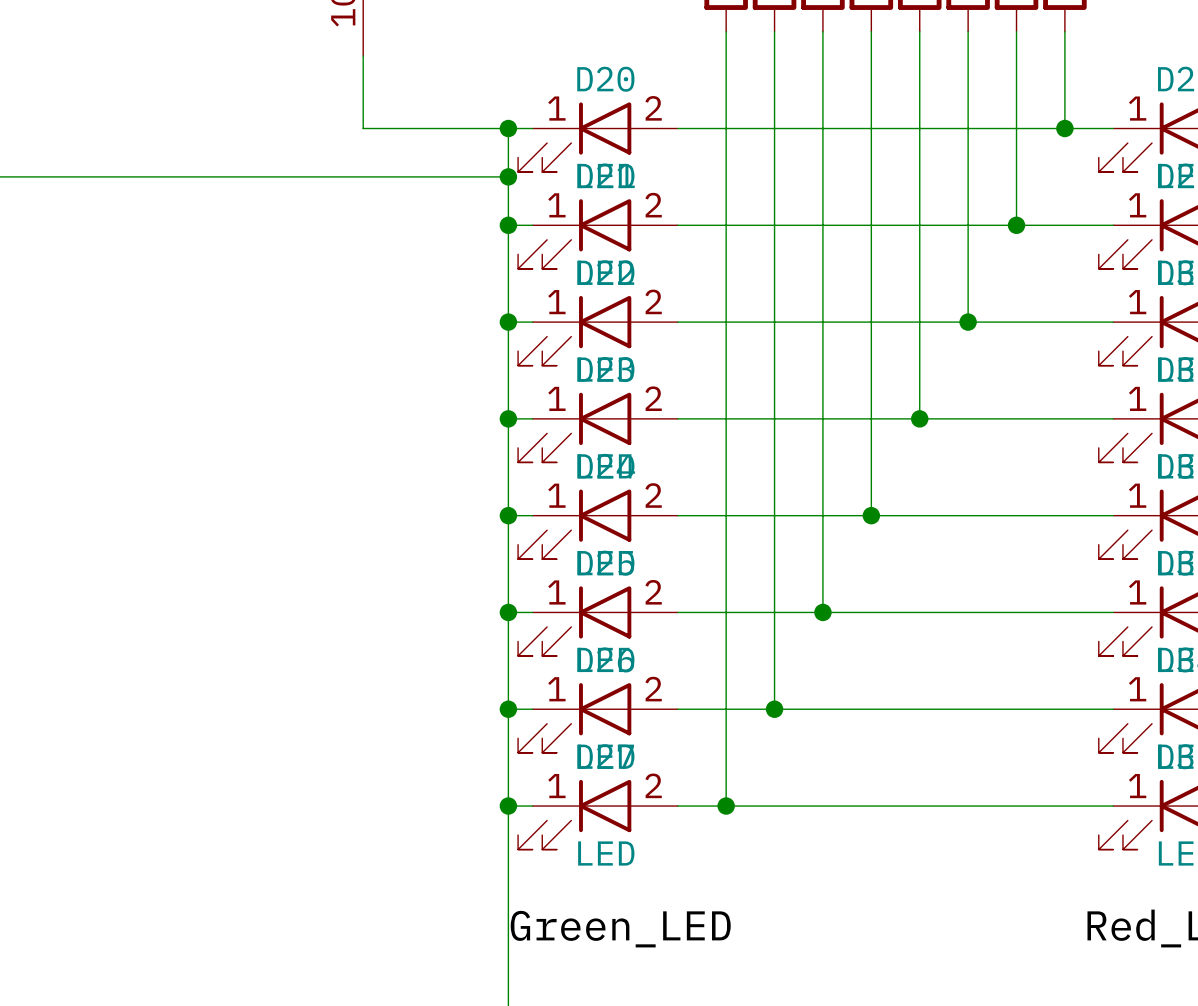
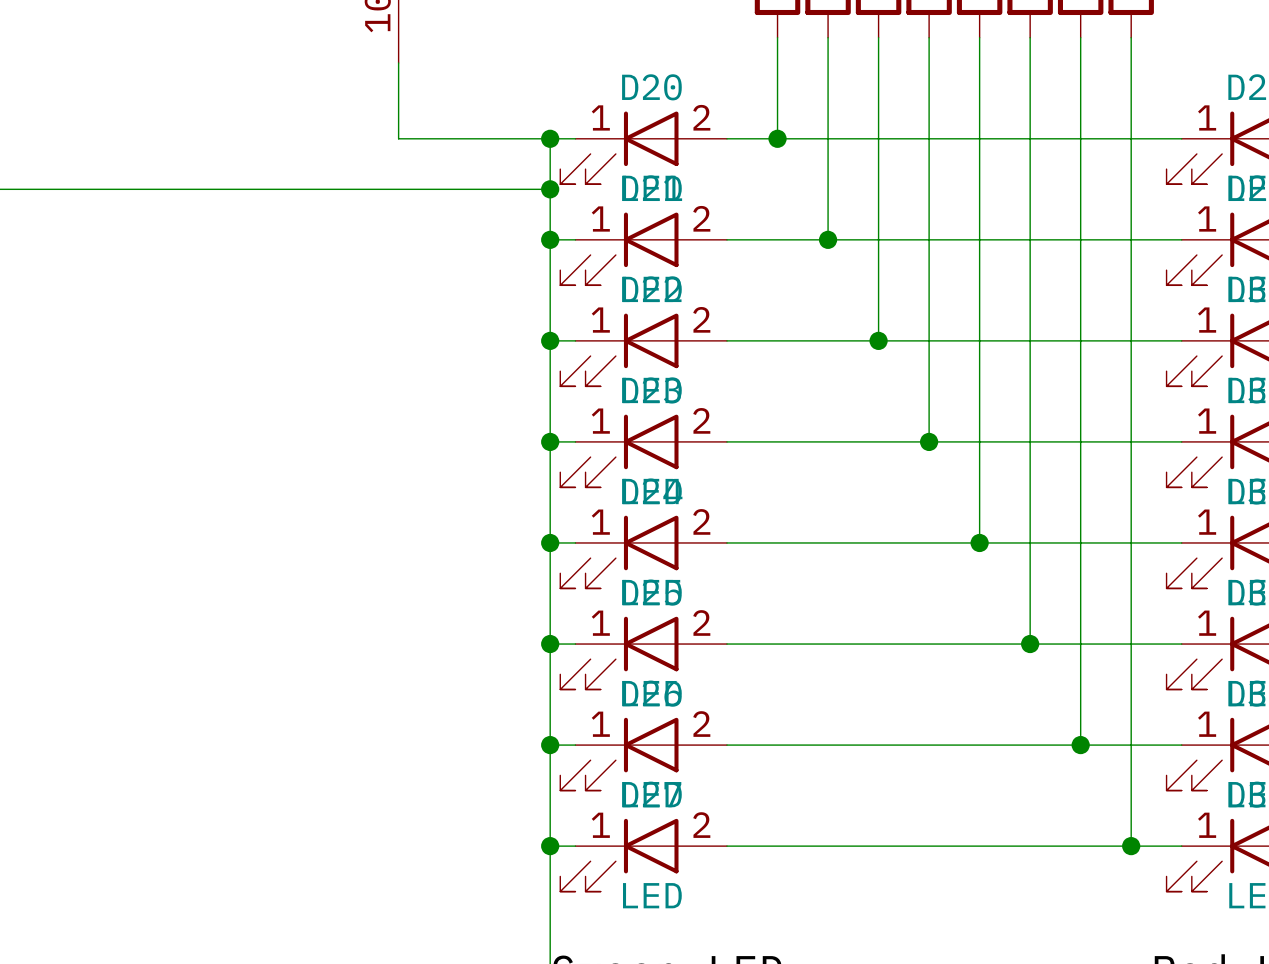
wire: (726, 128) (726, 806) -> (1131, 138) (1131, 846)
junction: none -> (777, 138)
junction: (1064, 128) -> none
wire: (774, 225) (774, 709) -> (1080, 239) (1080, 745)
junction: none -> (828, 239)
junction: (1016, 225) -> none
wire: (822, 322) (822, 612) -> (1030, 340) (1030, 644)
junction: none -> (878, 340)
junction: (968, 322) -> none
wire: (871, 418) (871, 515) -> (979, 441) (979, 542)
junction: none -> (929, 441)
junction: (919, 418) -> none
junction: (871, 515) -> none
junction: none -> (979, 542)
junction: (822, 612) -> none
junction: none -> (1030, 644)
junction: (774, 709) -> none
junction: none -> (1080, 745)
junction: (726, 806) -> none
junction: none -> (1131, 846)

